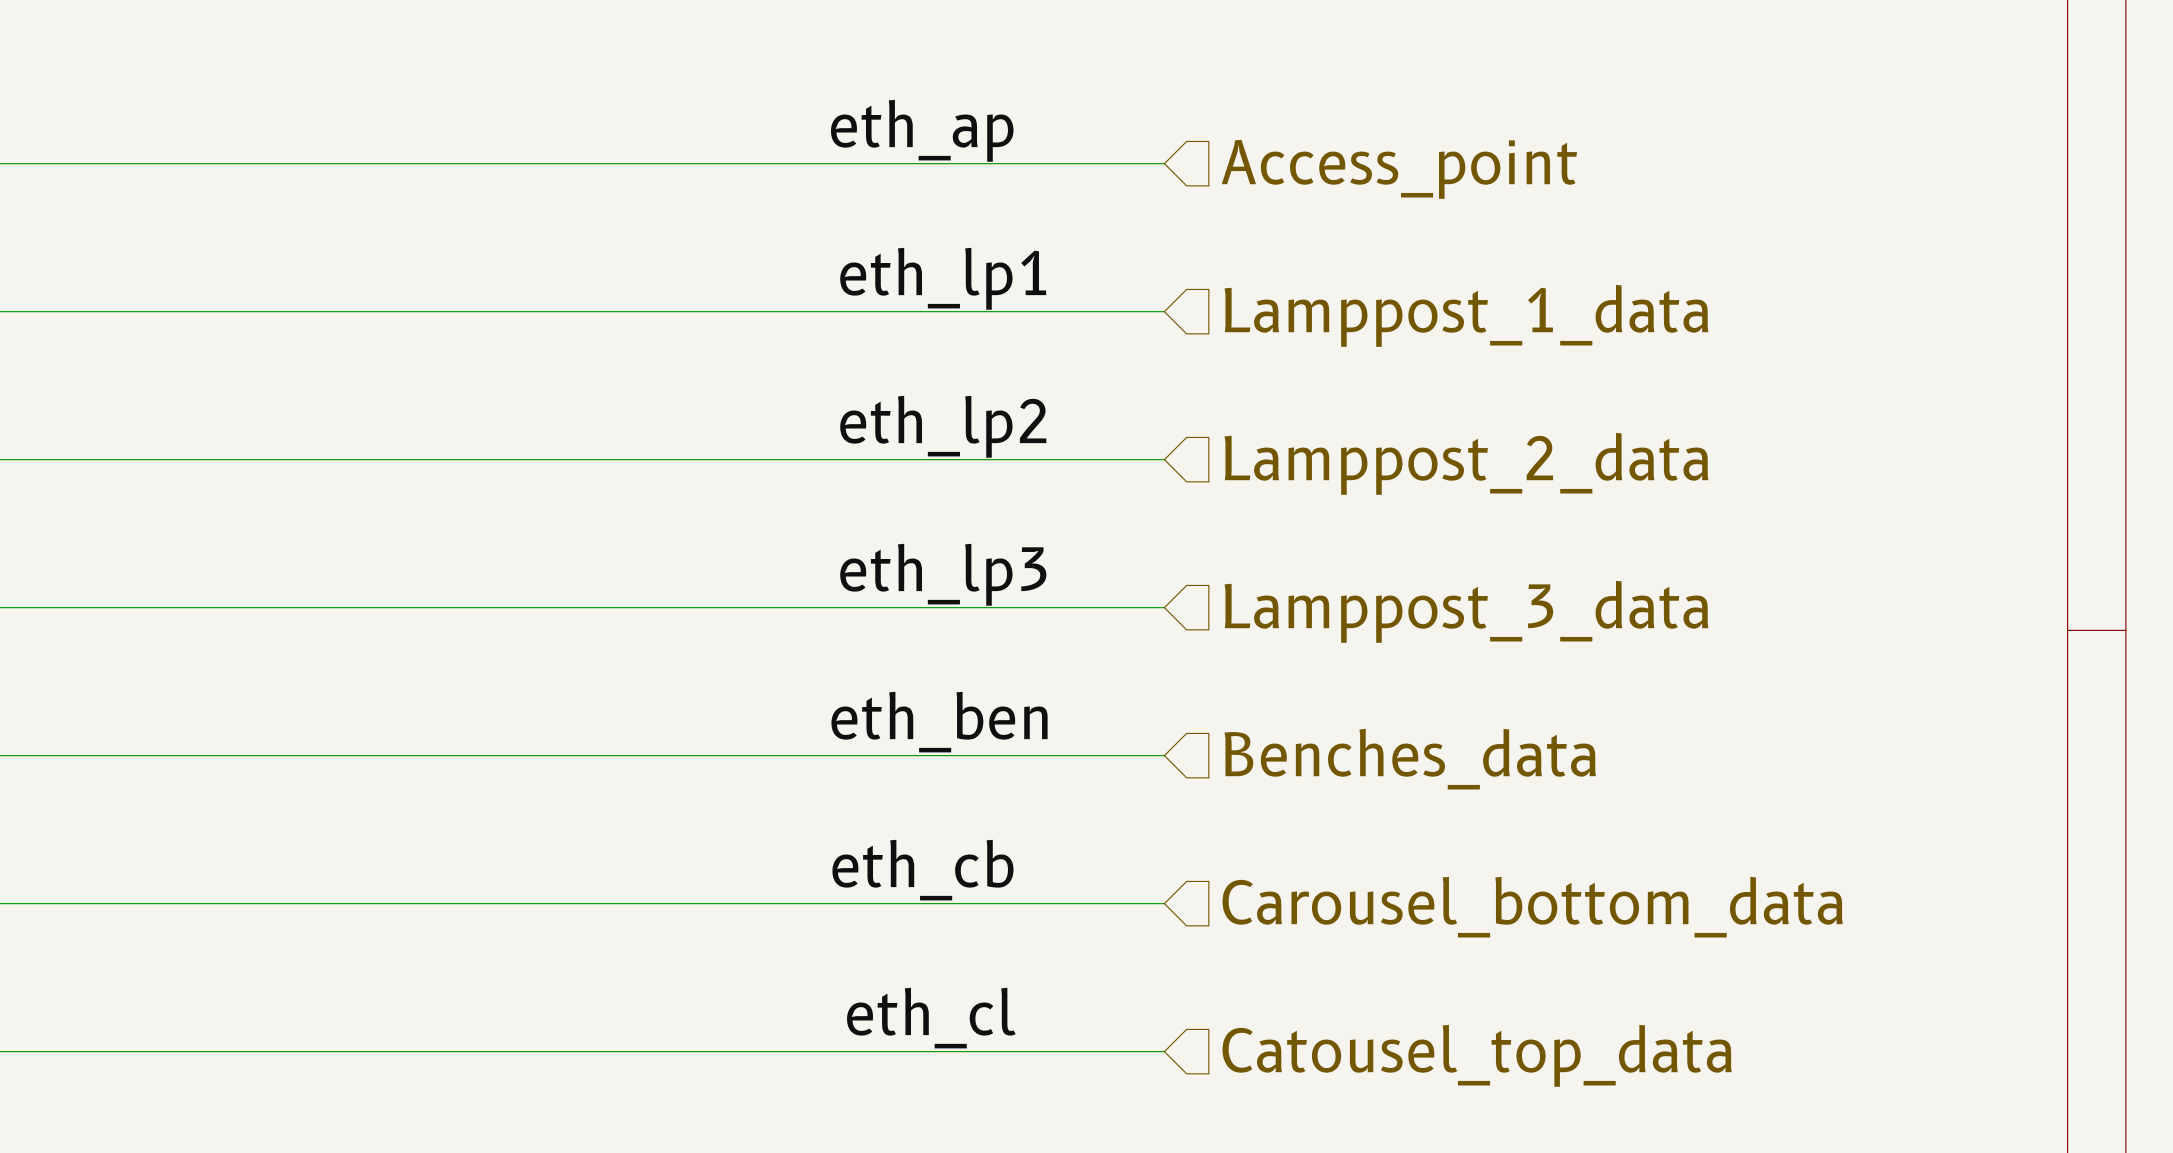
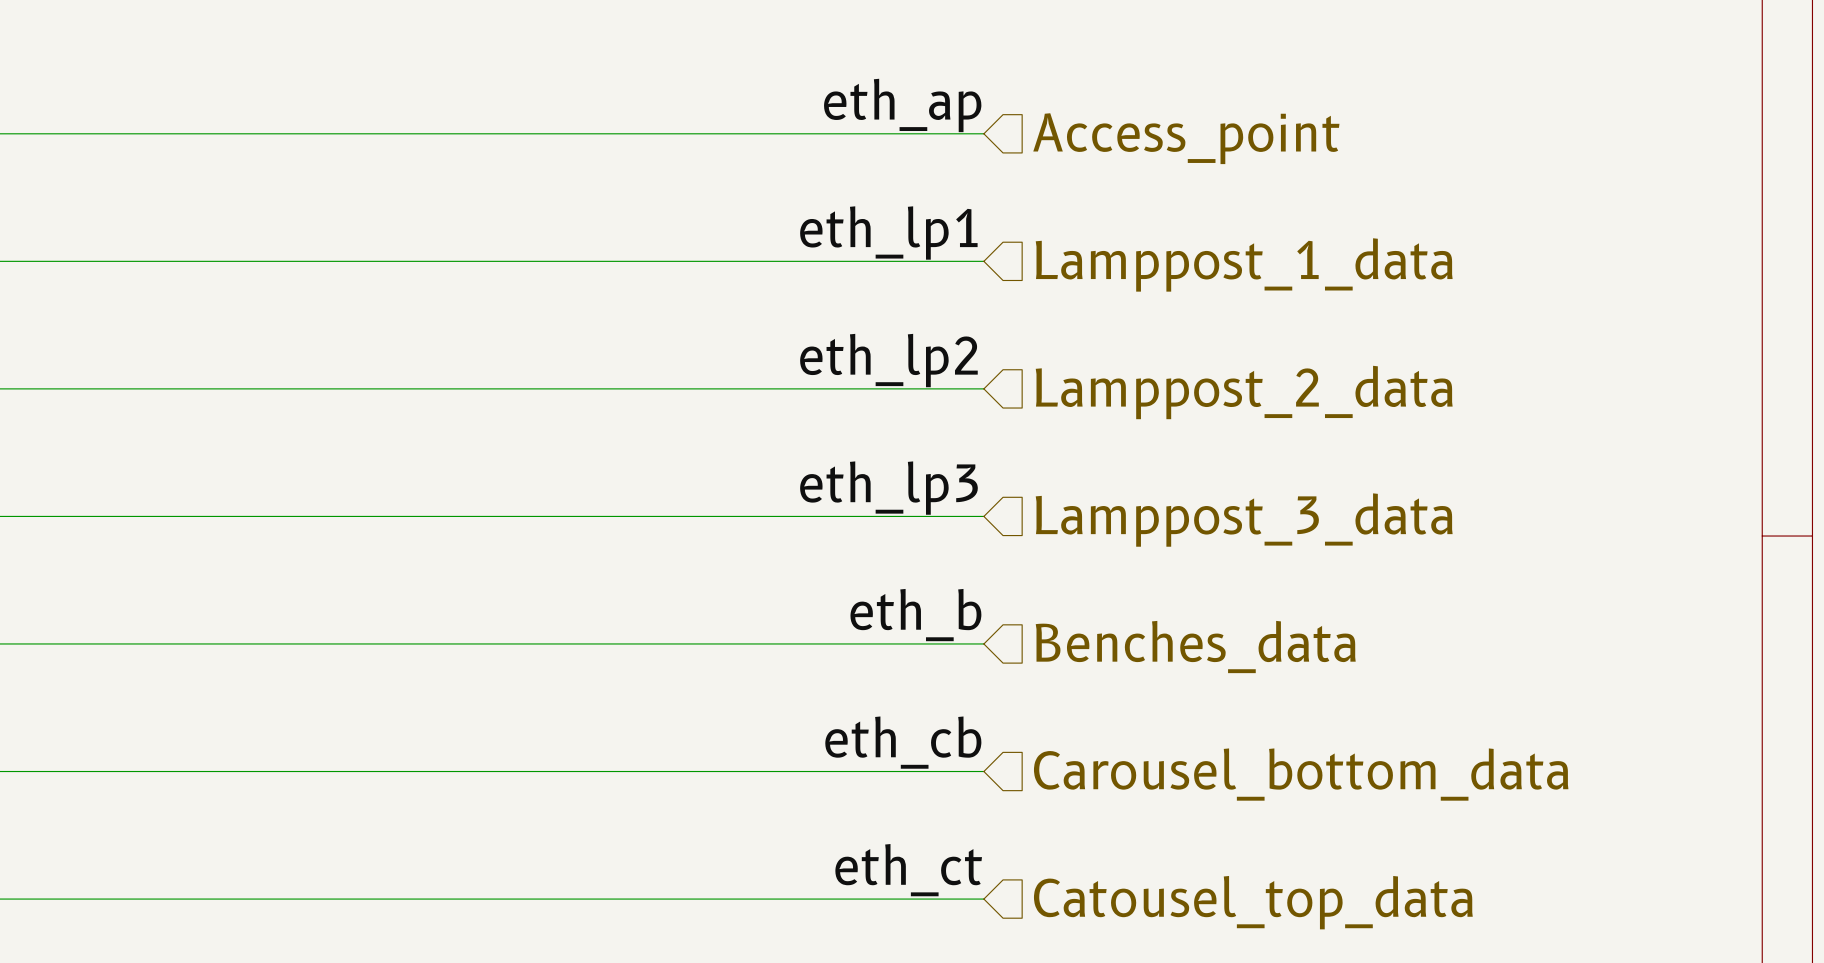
label position: eth_ap (922, 130) -> eth_ap (902, 105)
label position: eth_lp1 (943, 278) -> eth_lp1 (888, 233)
label position: eth_lp2 (943, 426) -> eth_lp2 (888, 360)
label position: eth_lp3 (943, 574) -> eth_lp3 (888, 488)
label: eth_ben (939, 722) -> eth_b (915, 615)
label position: eth_cb (922, 870) -> eth_cb (903, 742)
label: eth_cl (931, 1018) -> eth_ct (908, 870)

